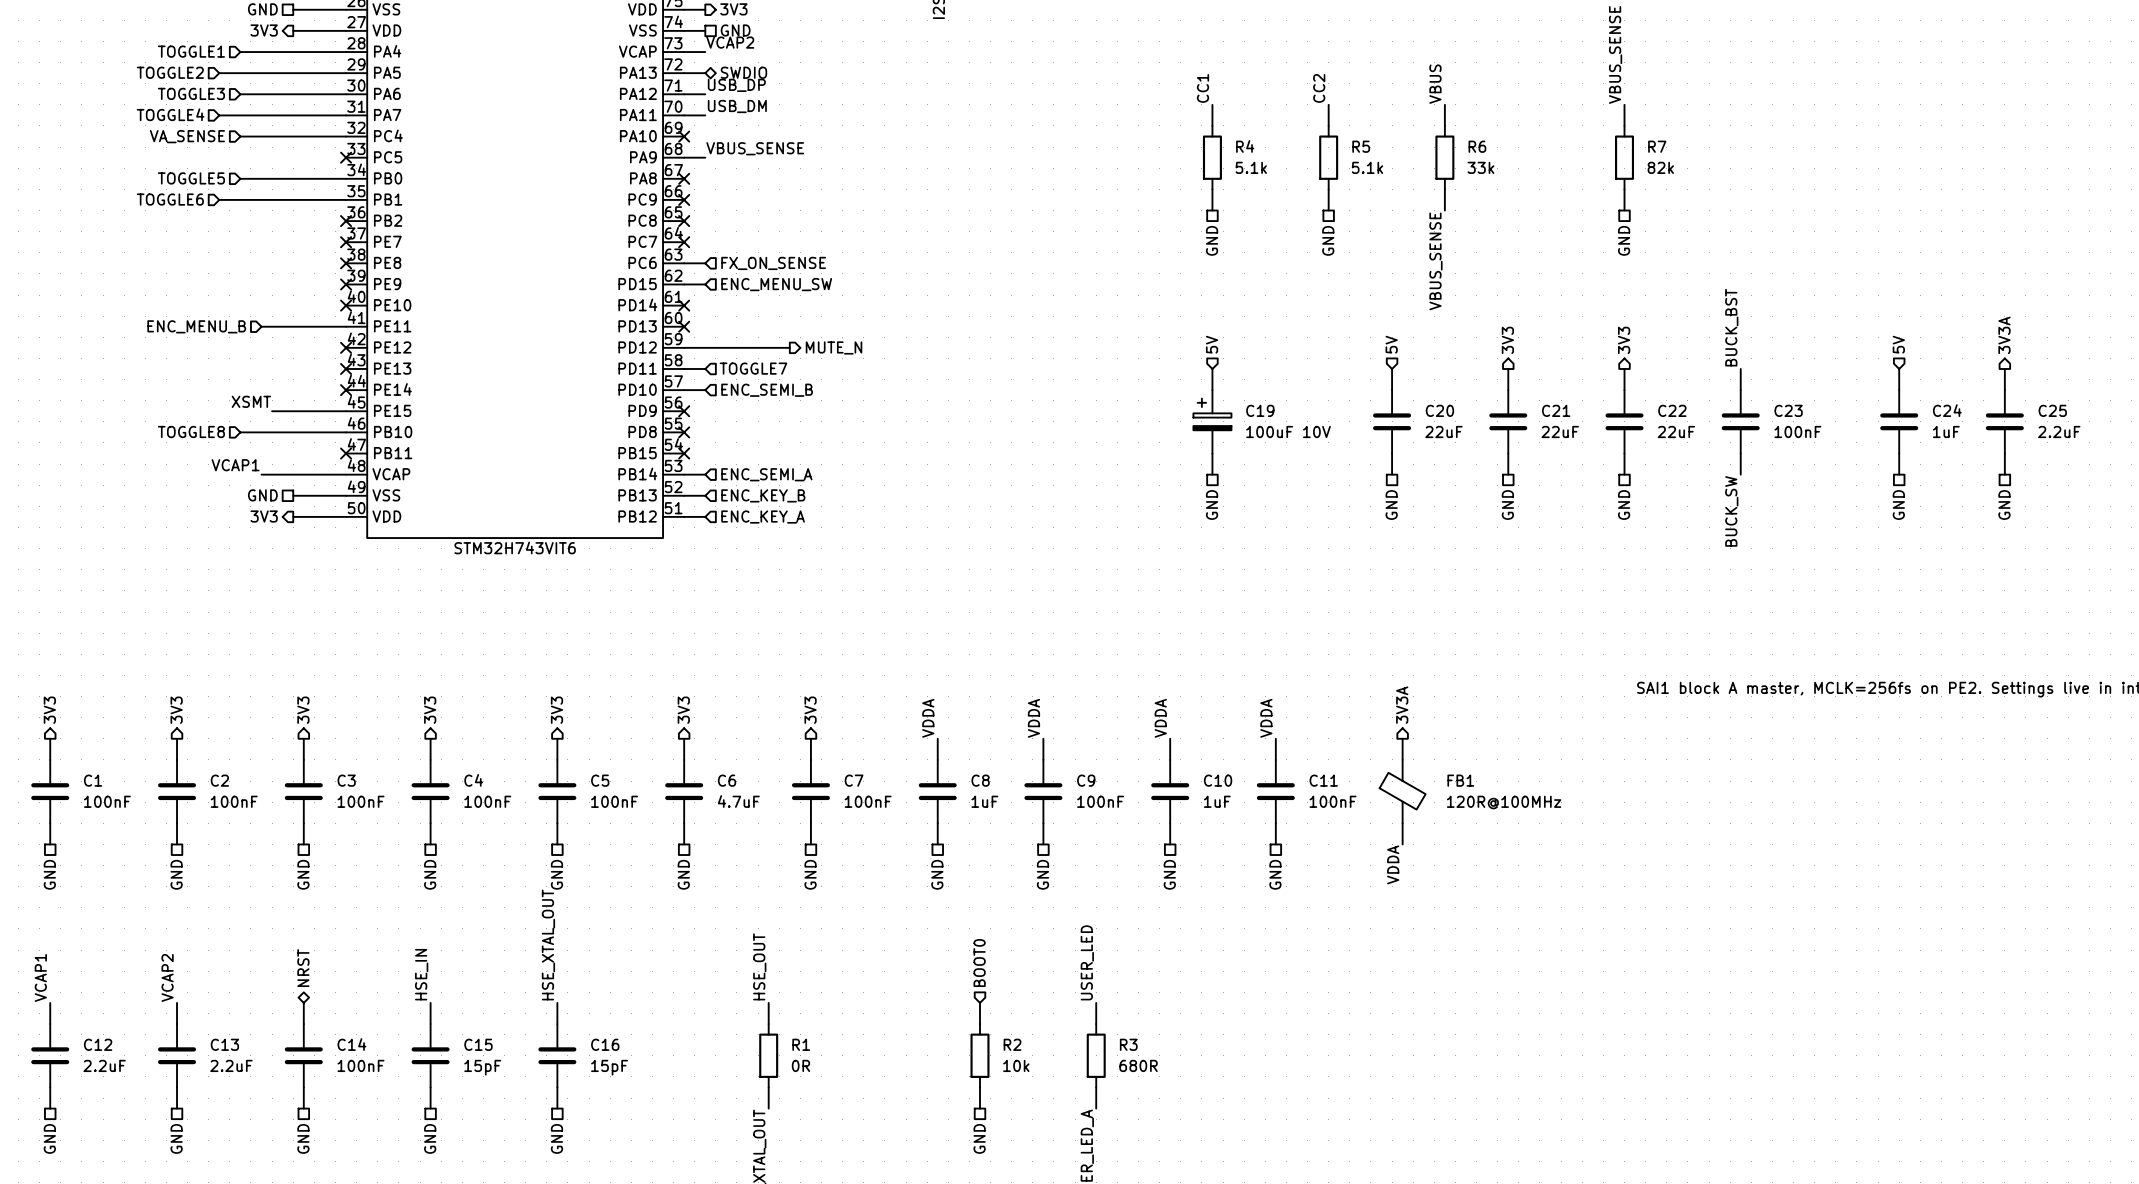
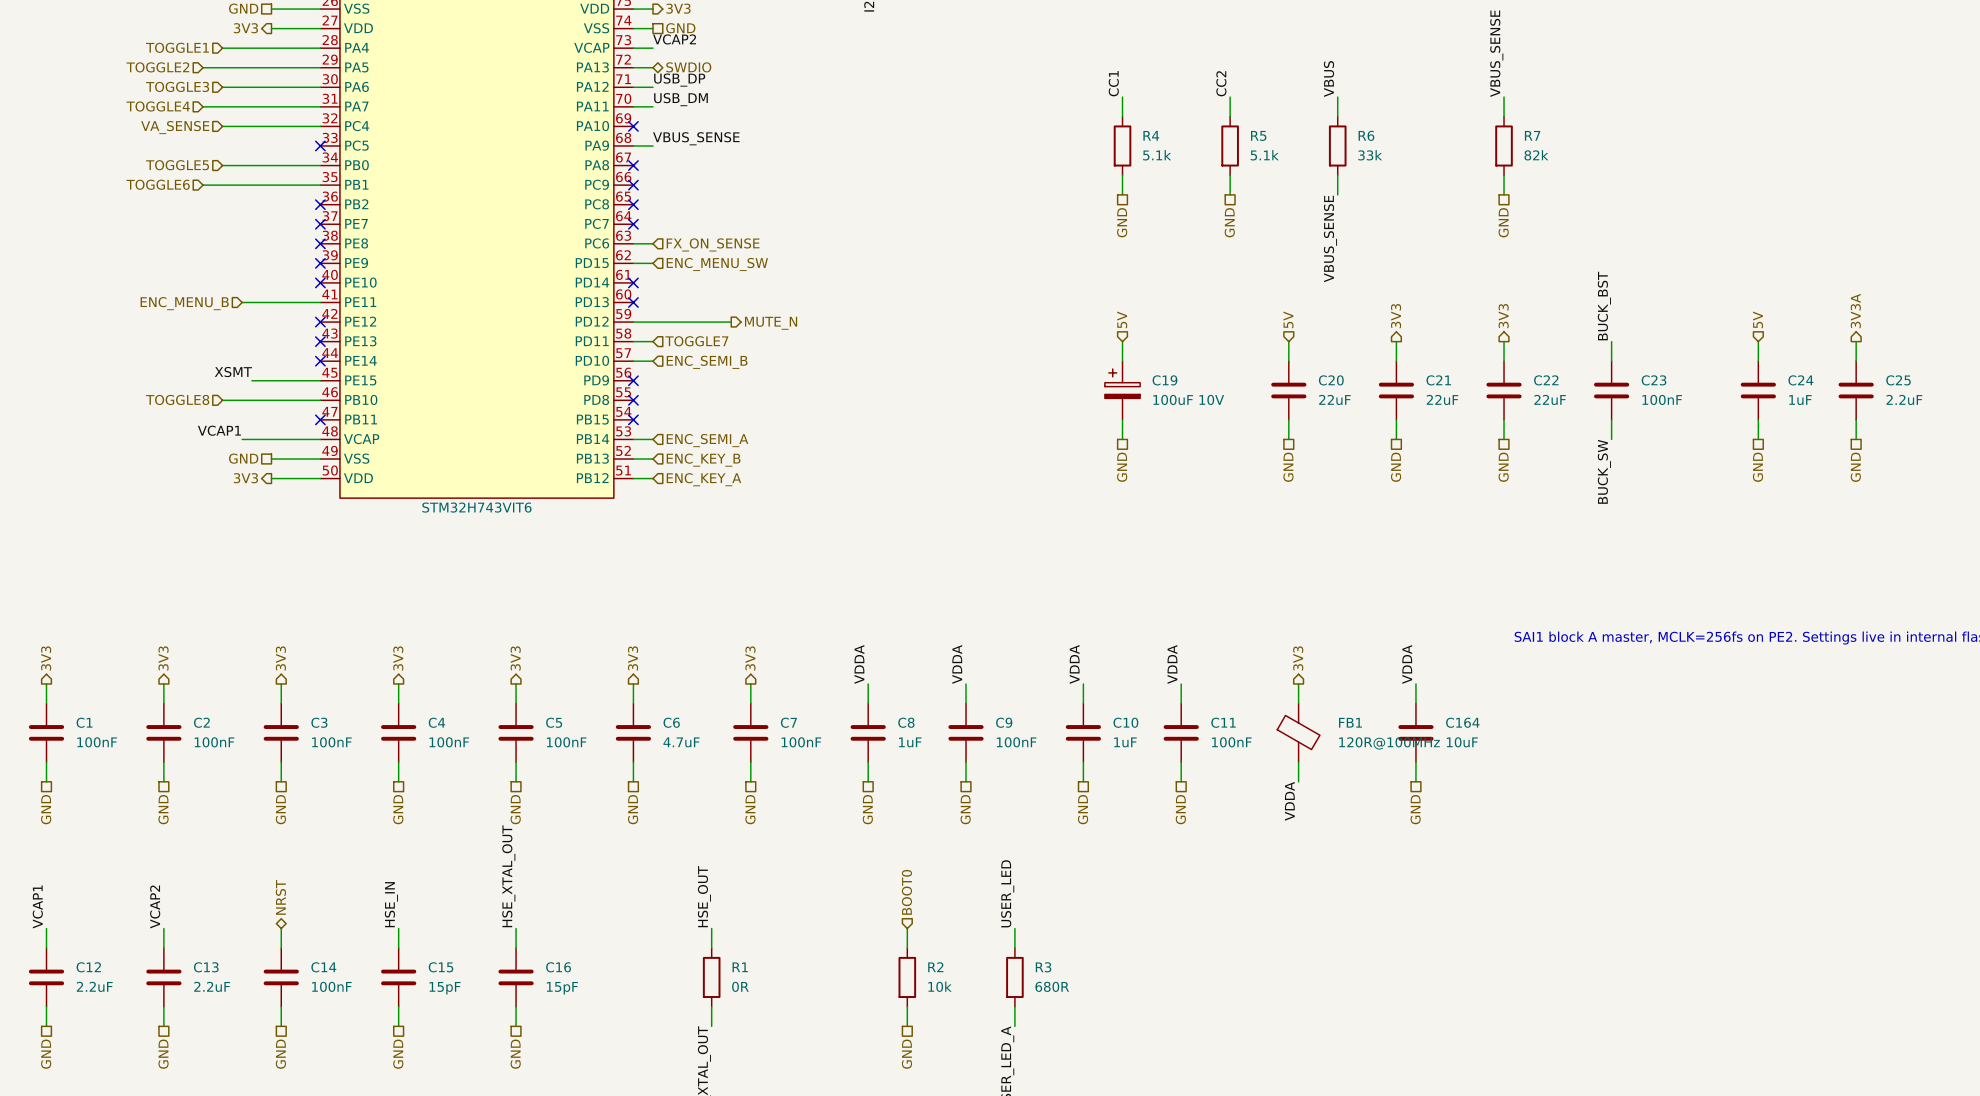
hierarchical label: 3V3A (1402, 705) -> 3V3 (1298, 658)
label: none -> VDDA (1407, 664)
wire: none -> (1415, 683) (1415, 703)
C164: none -> 10uF (1415, 732)
wire: none -> (1415, 762) (1415, 781)
hierarchical label: none -> GND (1415, 809)

